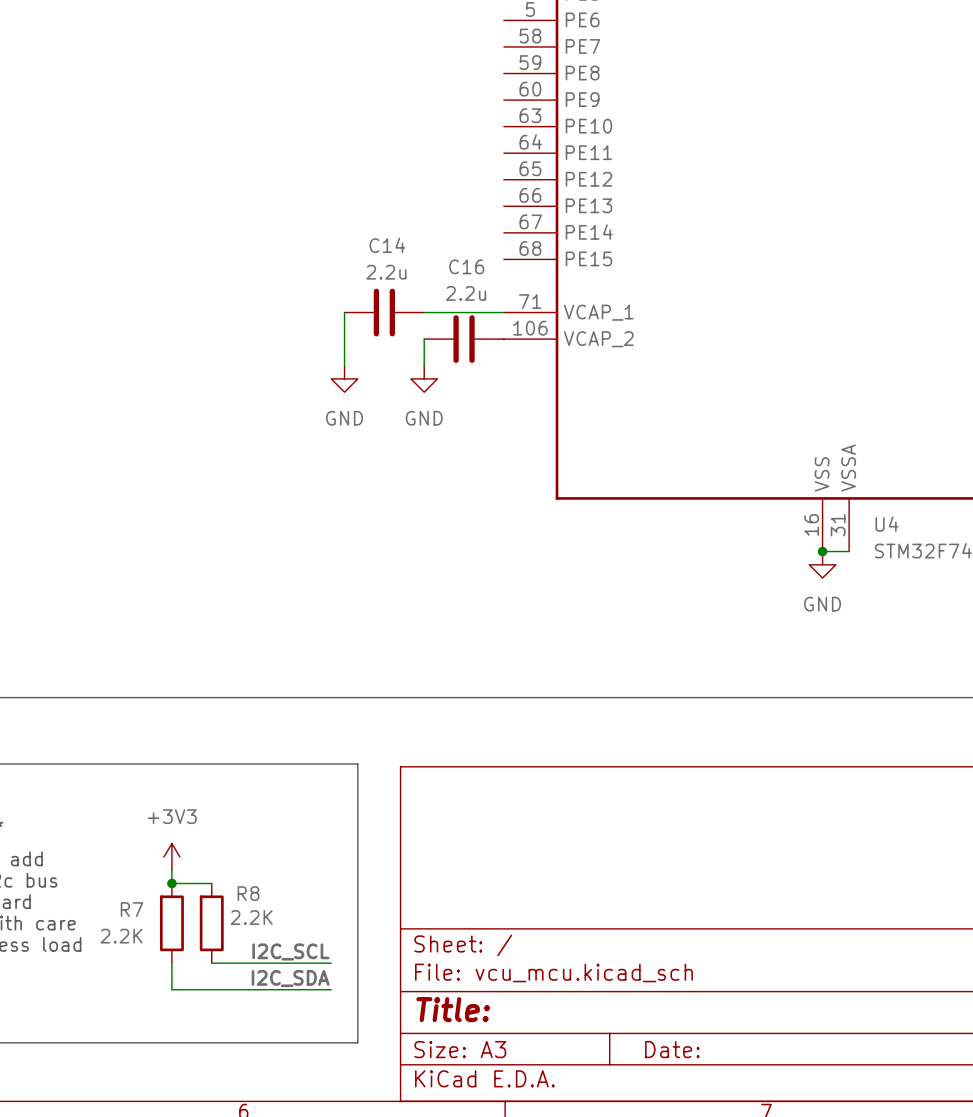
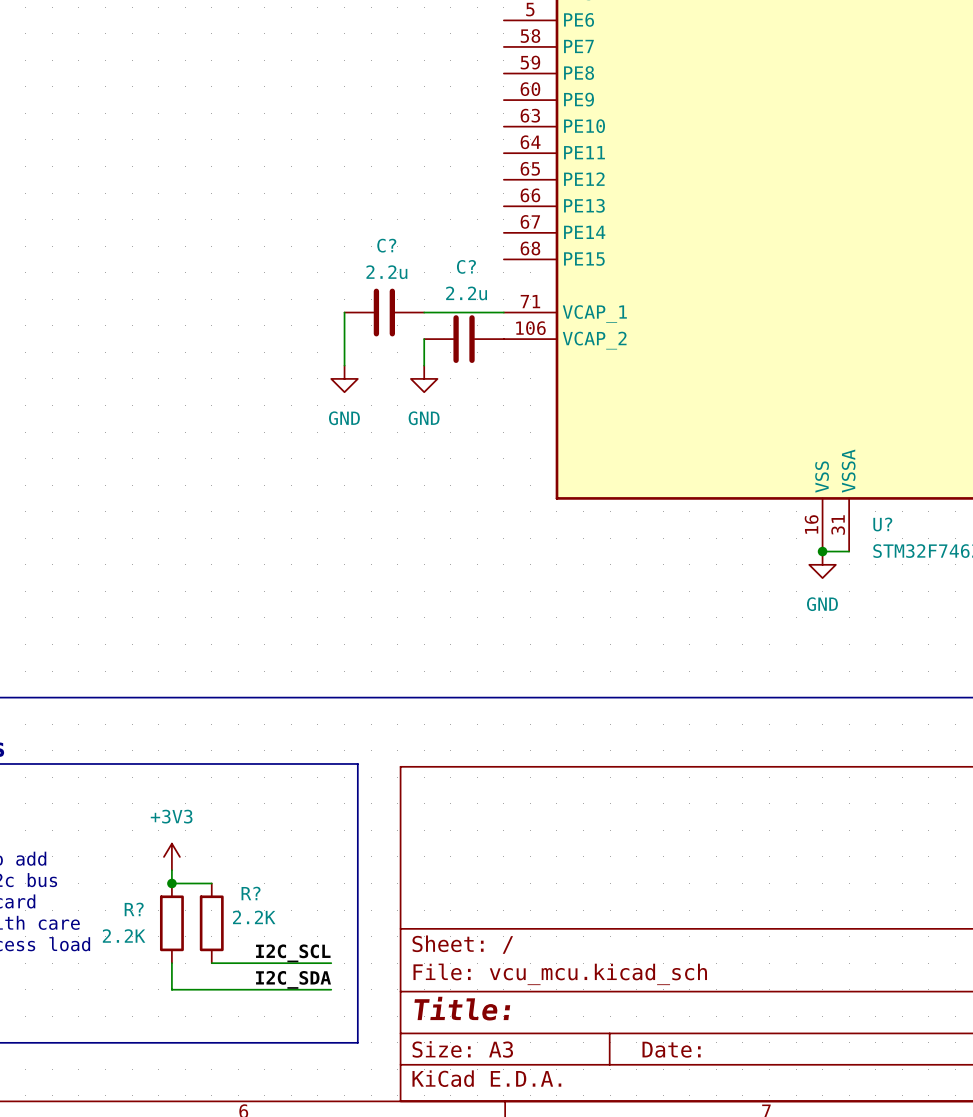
C14 name: C14 (387, 245) -> C? (386, 245)
C16 name: C16 (466, 266) -> C? (466, 266)
U4 name: U4 (887, 524) -> U? (882, 524)
R8 name: R8 (248, 893) -> R? (251, 893)
R7 name: R7 (131, 909) -> R? (134, 909)

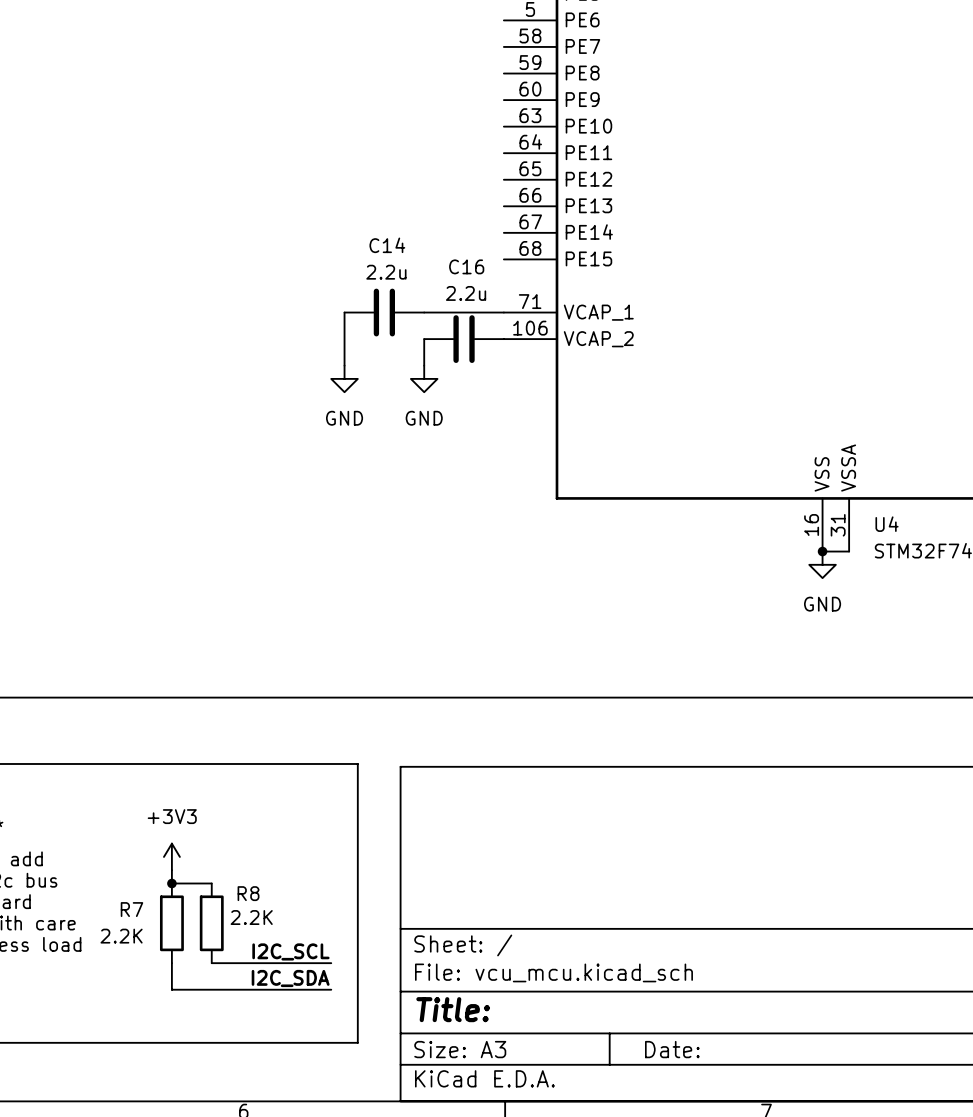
C? name: C? (386, 245) -> C14 (387, 245)
C? name: C? (466, 266) -> C16 (466, 266)
U? name: U? (882, 524) -> U4 (887, 524)
R? name: R? (251, 893) -> R8 (248, 893)
R? name: R? (134, 909) -> R7 (131, 909)

